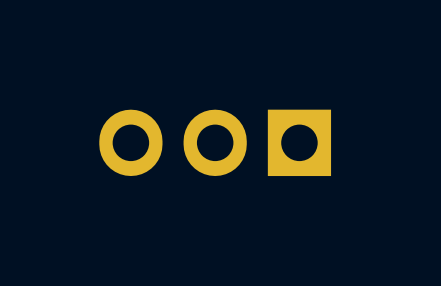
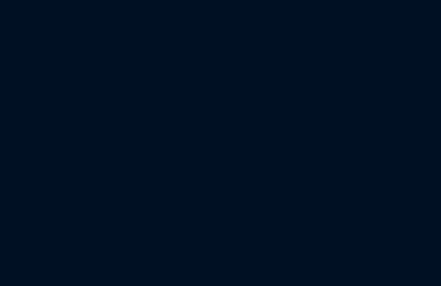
part: (215, 142) -> none

